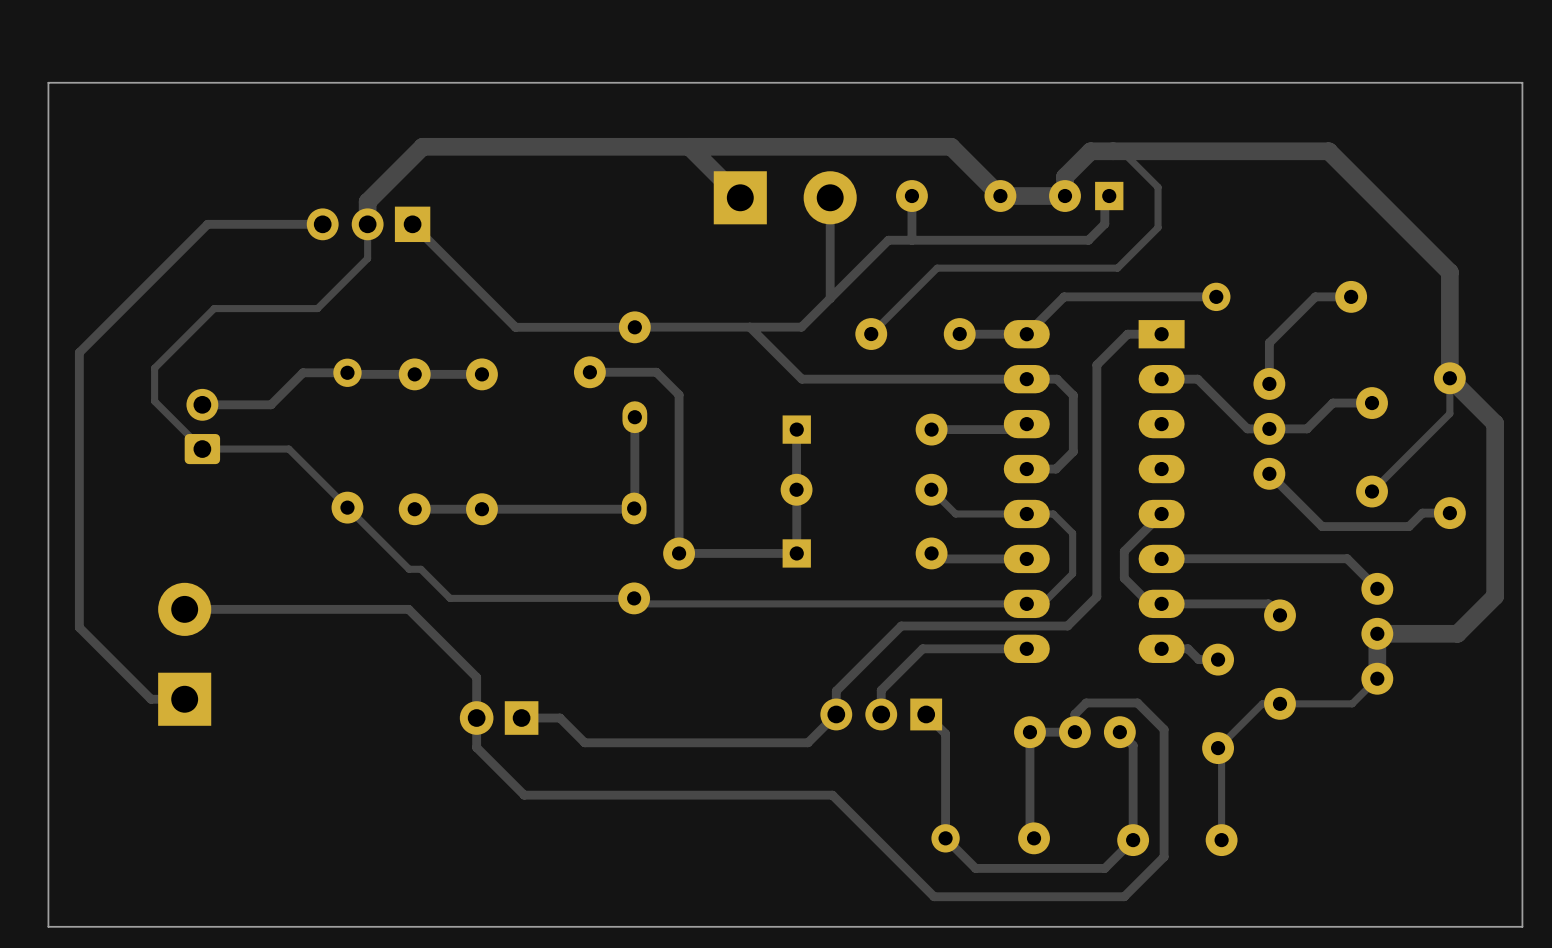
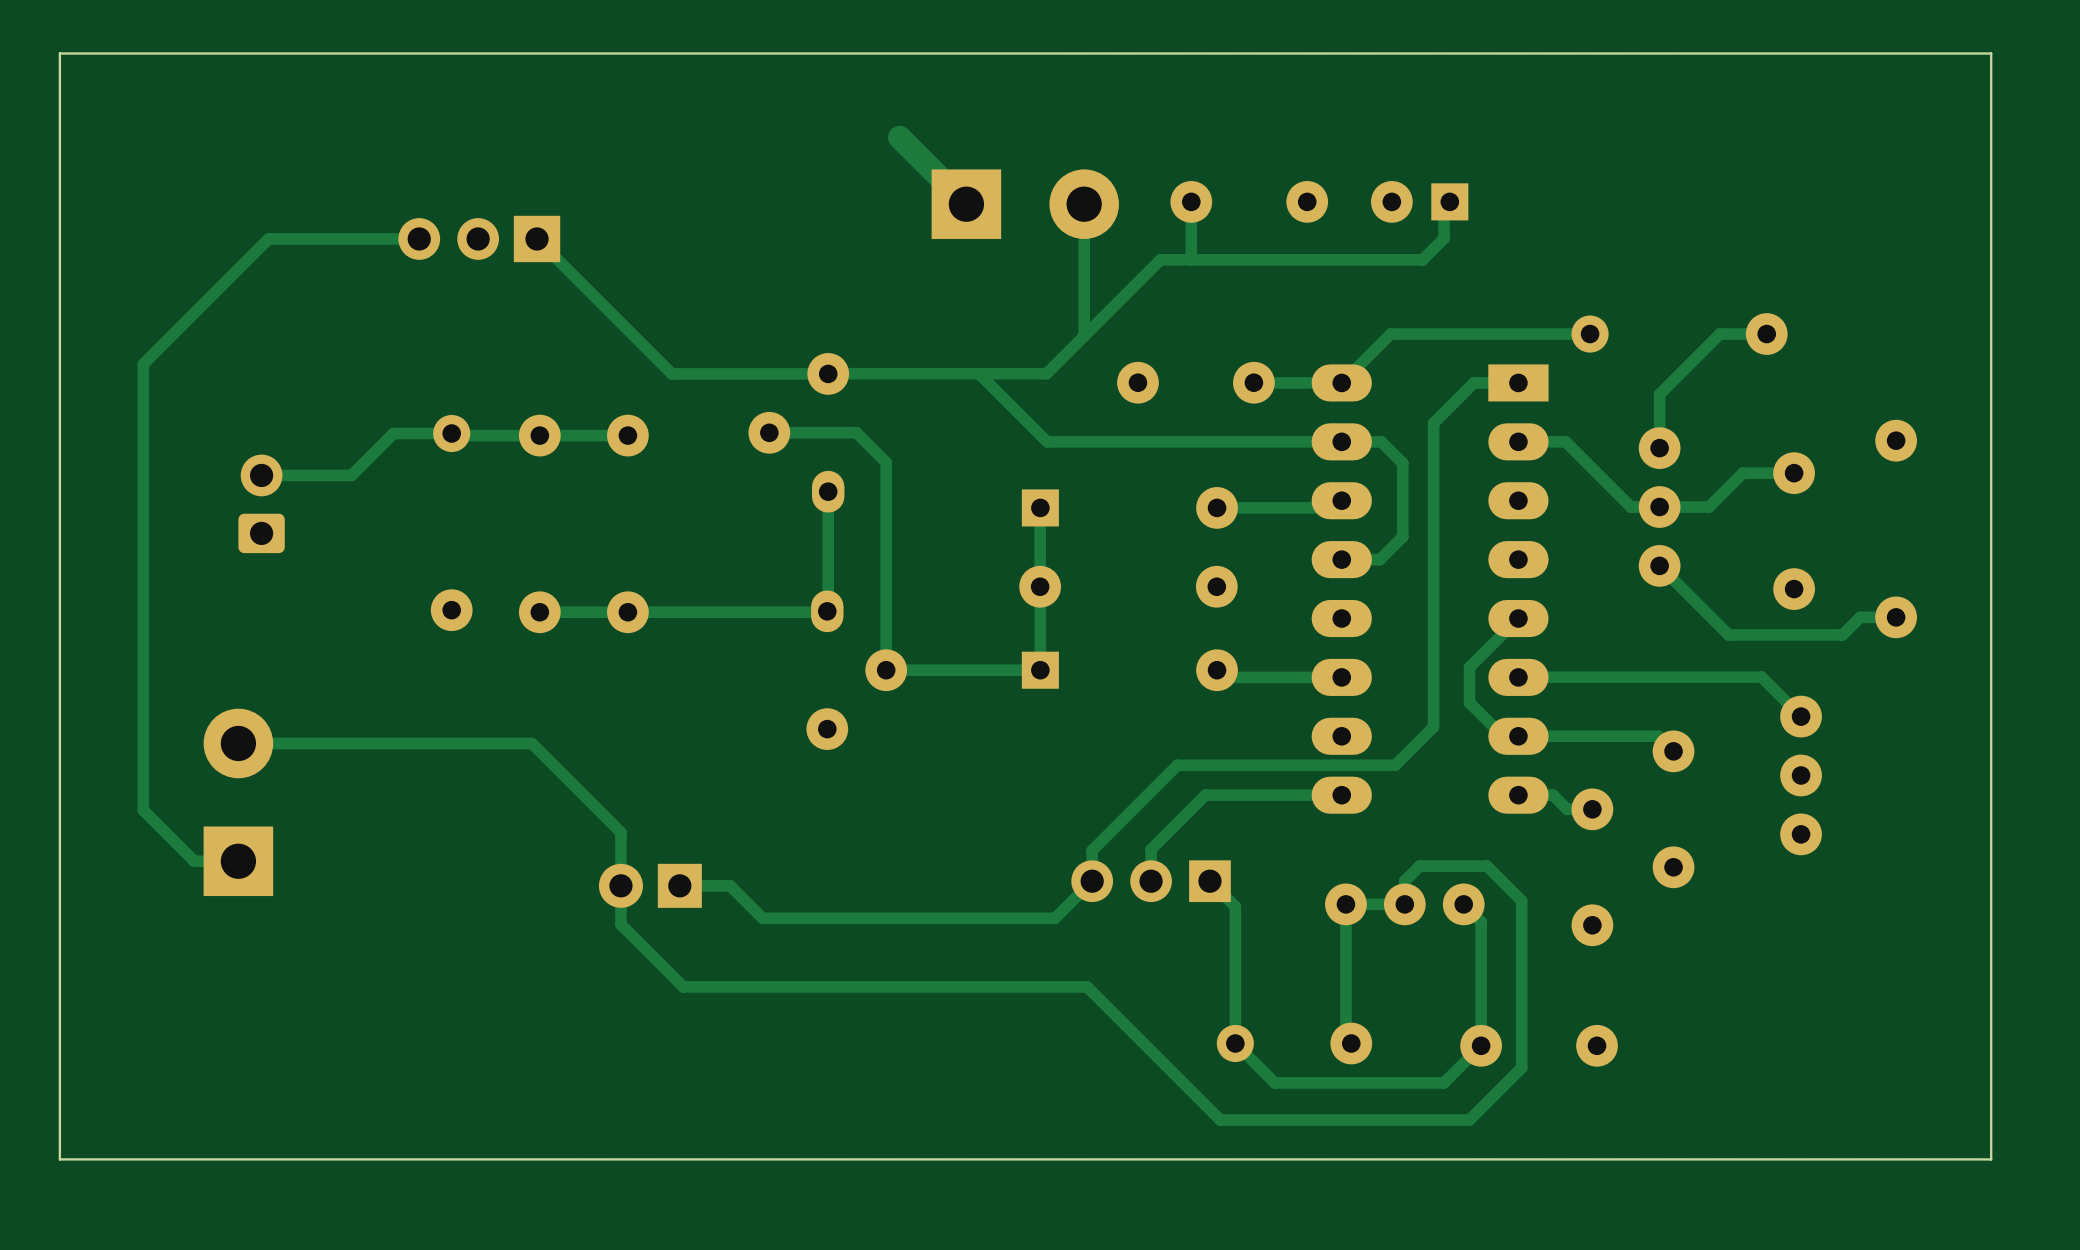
track: (1113, 151) (1122, 151) (1158, 187) (1158, 227) (1117, 268) (937, 268) (871, 334) -> none
track: (112, 319) (79, 352) (79, 627) (112, 660) -> (143, 364) (143, 810)
track: (1449, 378) (1449, 413) (1372, 491) -> none
track: (1449, 378) (1495, 423) (1495, 596) (1457, 633) (1377, 633) (1377, 678) (1352, 703) (1262, 703) (1218, 748) (1221, 751) (1221, 840) -> none
track: (1449, 378) (1449, 272) (1328, 151) (1090, 151) (1065, 176) (1065, 196) (1000, 196) (951, 146) (422, 146) (367, 201) (367, 258) (317, 308) (214, 308) (154, 368) (154, 401) (202, 449) (288, 449) (409, 569) (420, 569) (450, 598) (634, 598) (639, 603) (1042, 603) (1072, 573) (1072, 533) (1053, 513) (955, 513) (931, 489) -> none

